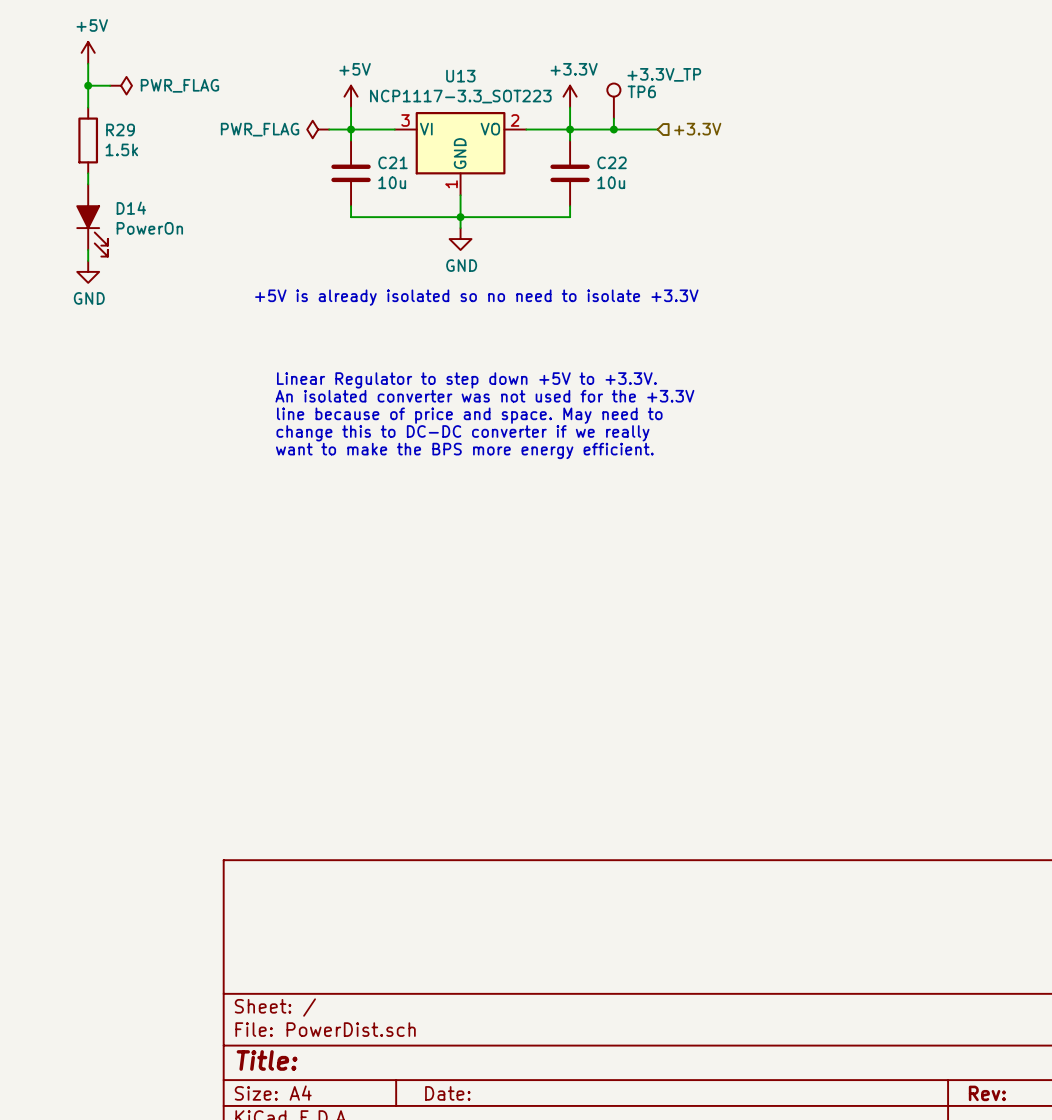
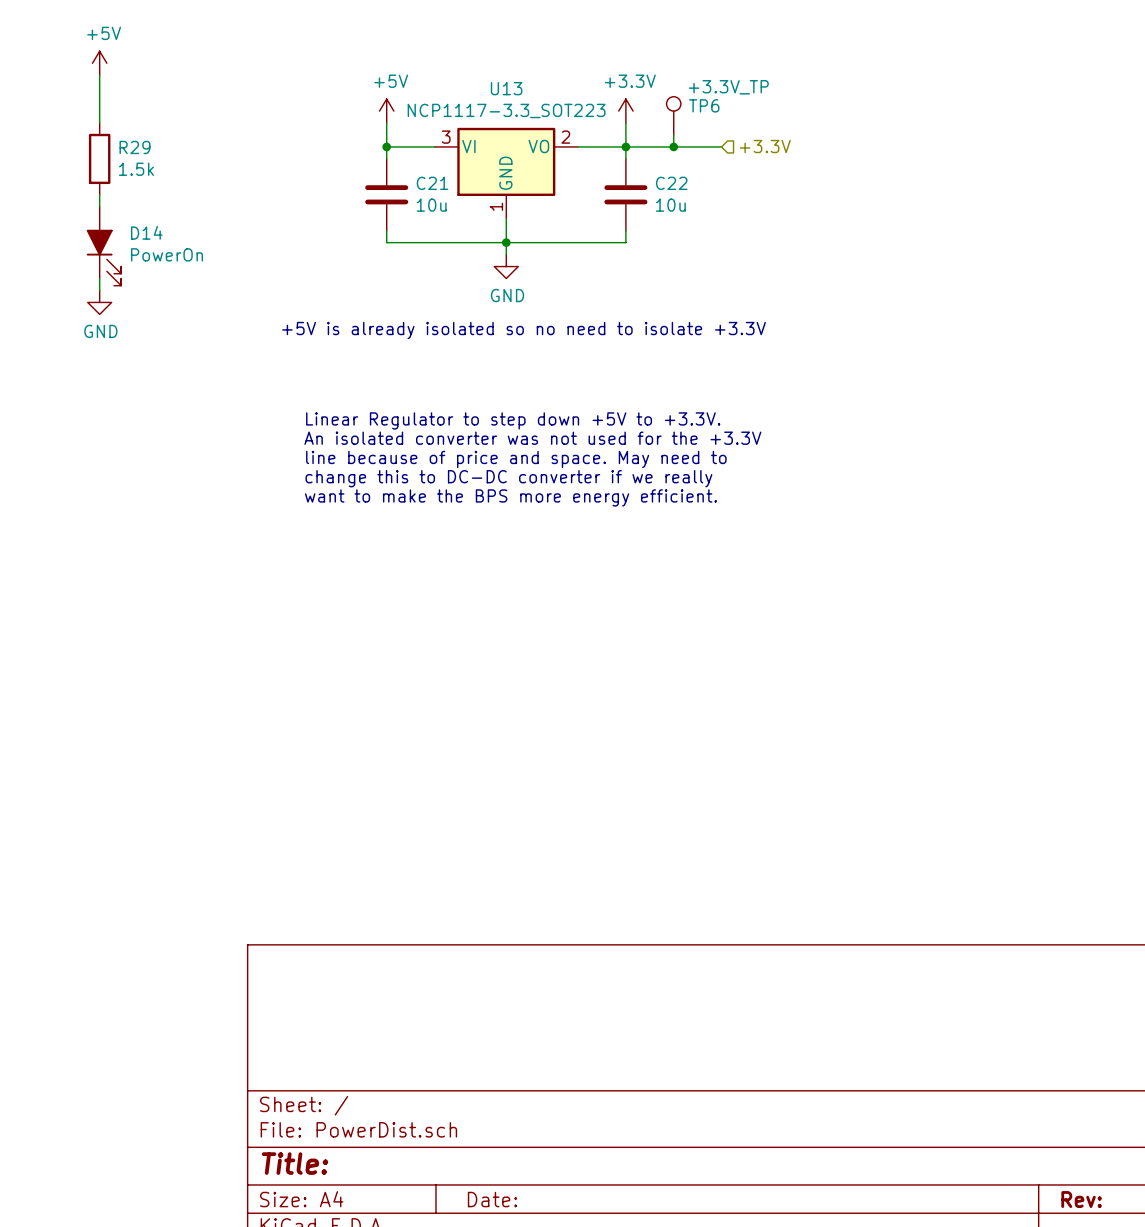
wire: (88, 85) (110, 85) -> none
junction: (88, 85) -> none
power symbol: PWR_FLAG (121, 85) -> none
power symbol: PWR_FLAG (318, 129) -> none
wire: (329, 129) (351, 129) -> none

